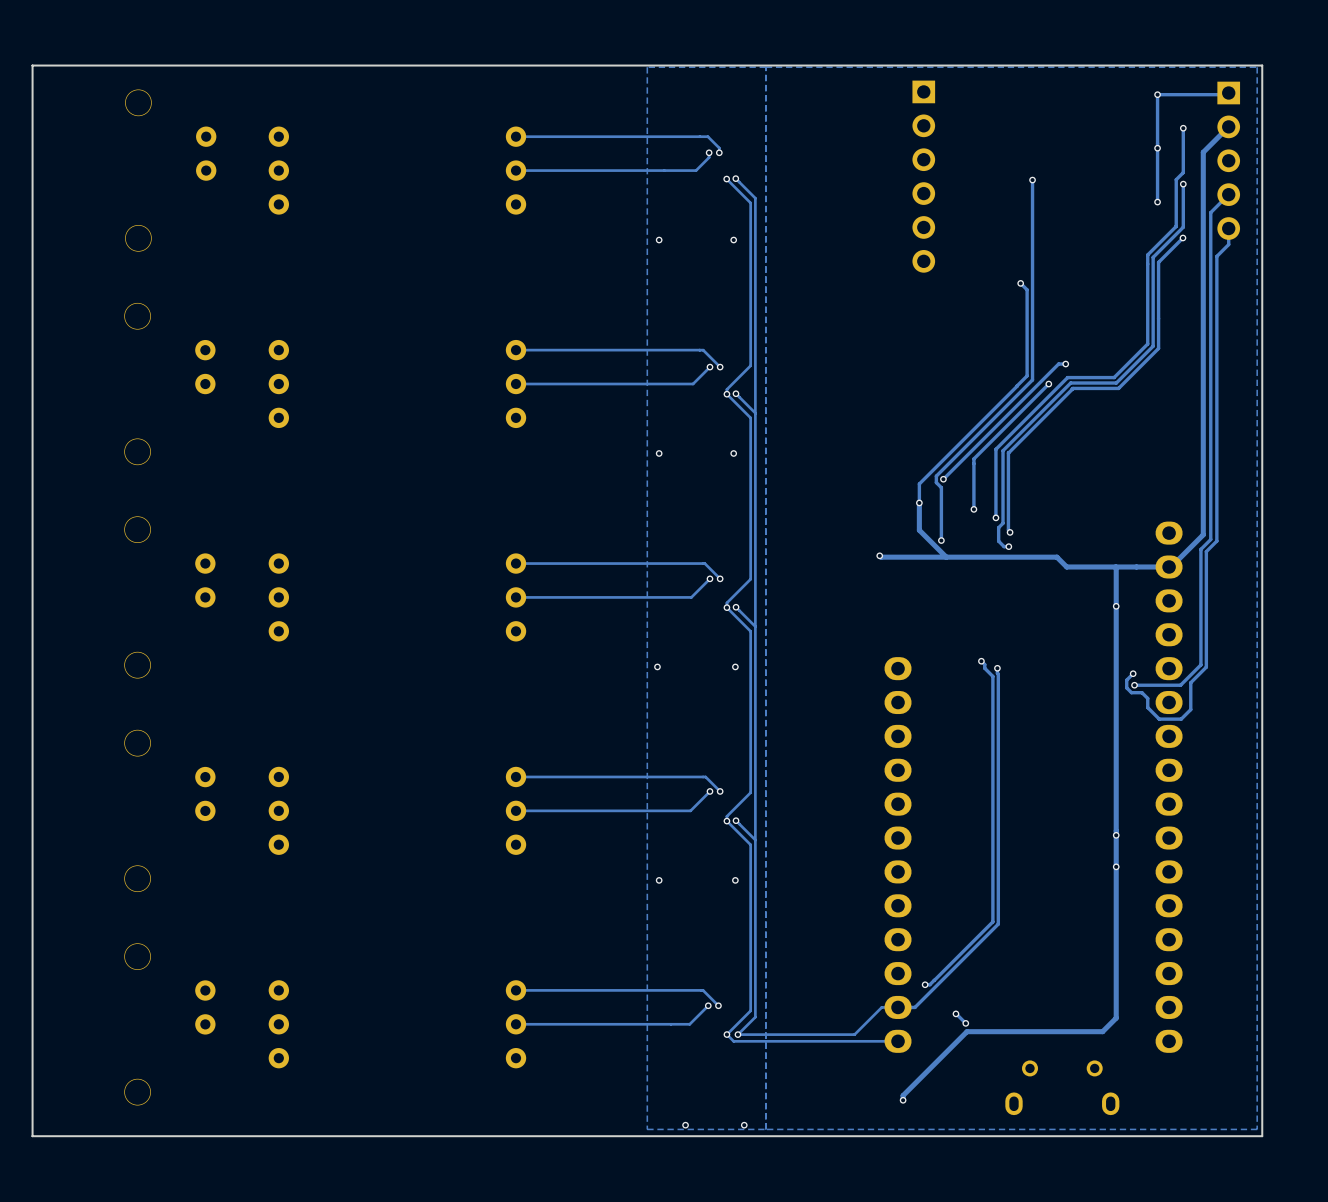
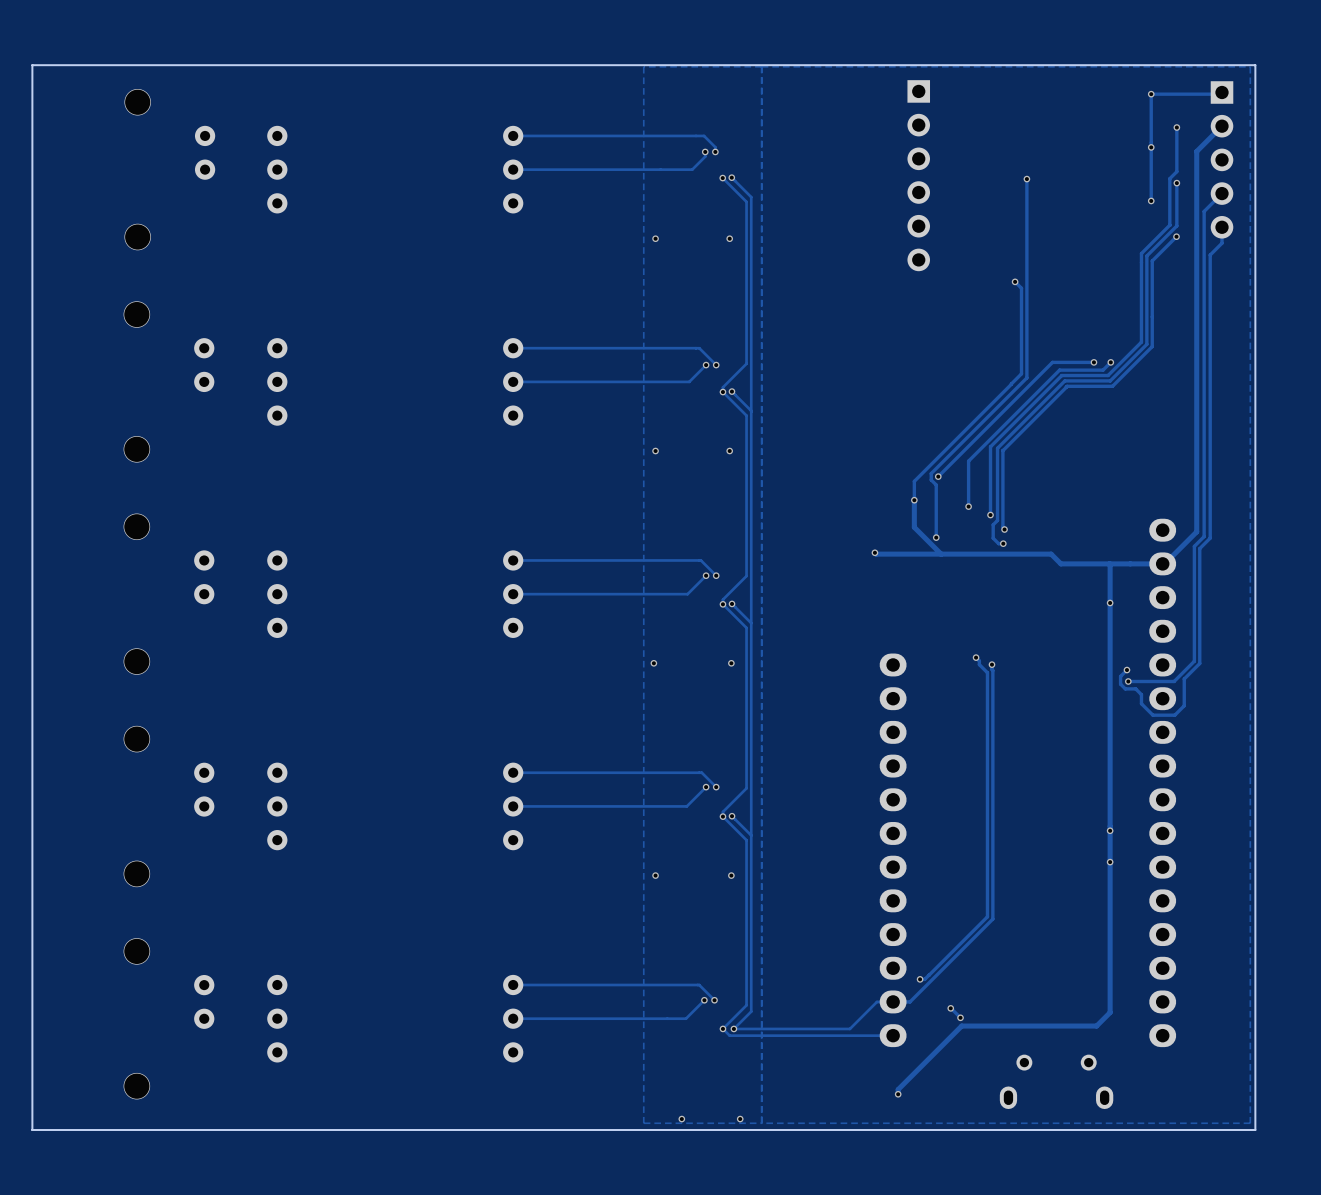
track: (1065, 364) (1058, 364) -> (1093, 362) (1052, 362)
via: (1065, 364) -> none
via: none -> (1093, 362)
via: none -> (1110, 362)
track: (1048, 384) (973, 458) (973, 463) -> (1110, 362) (1103, 370) (1059, 370) (968, 461)
via: (1048, 384) -> none

